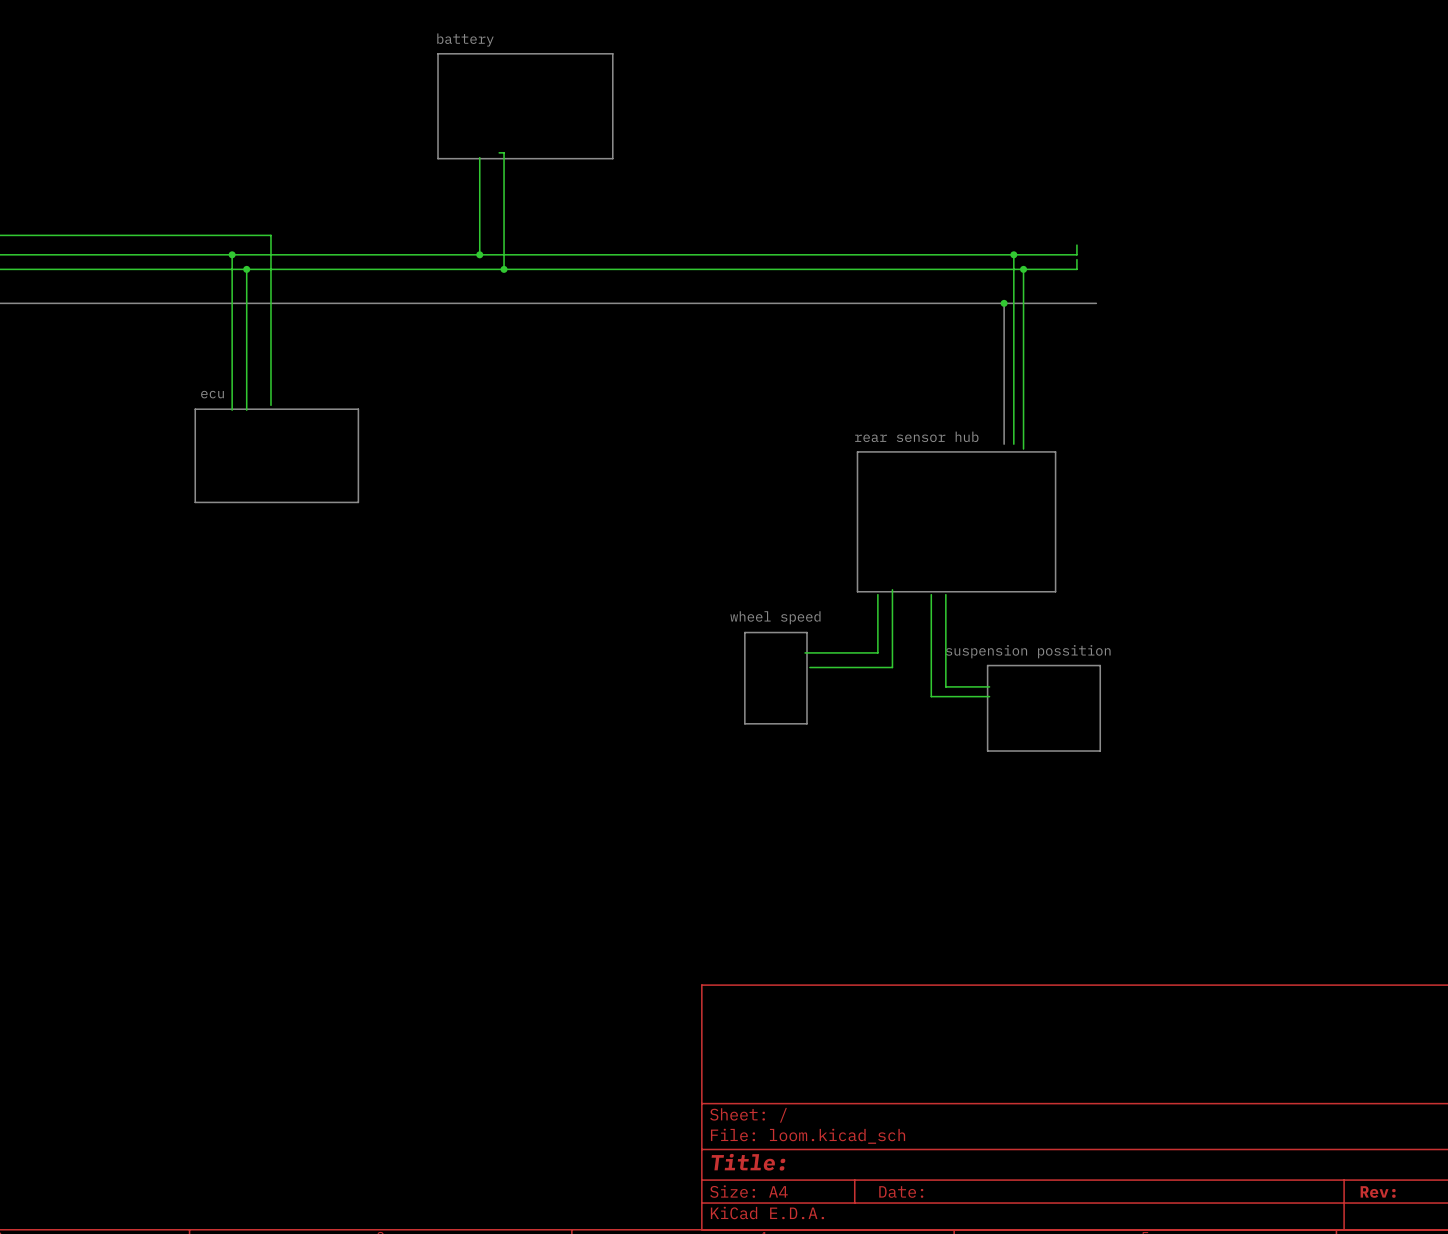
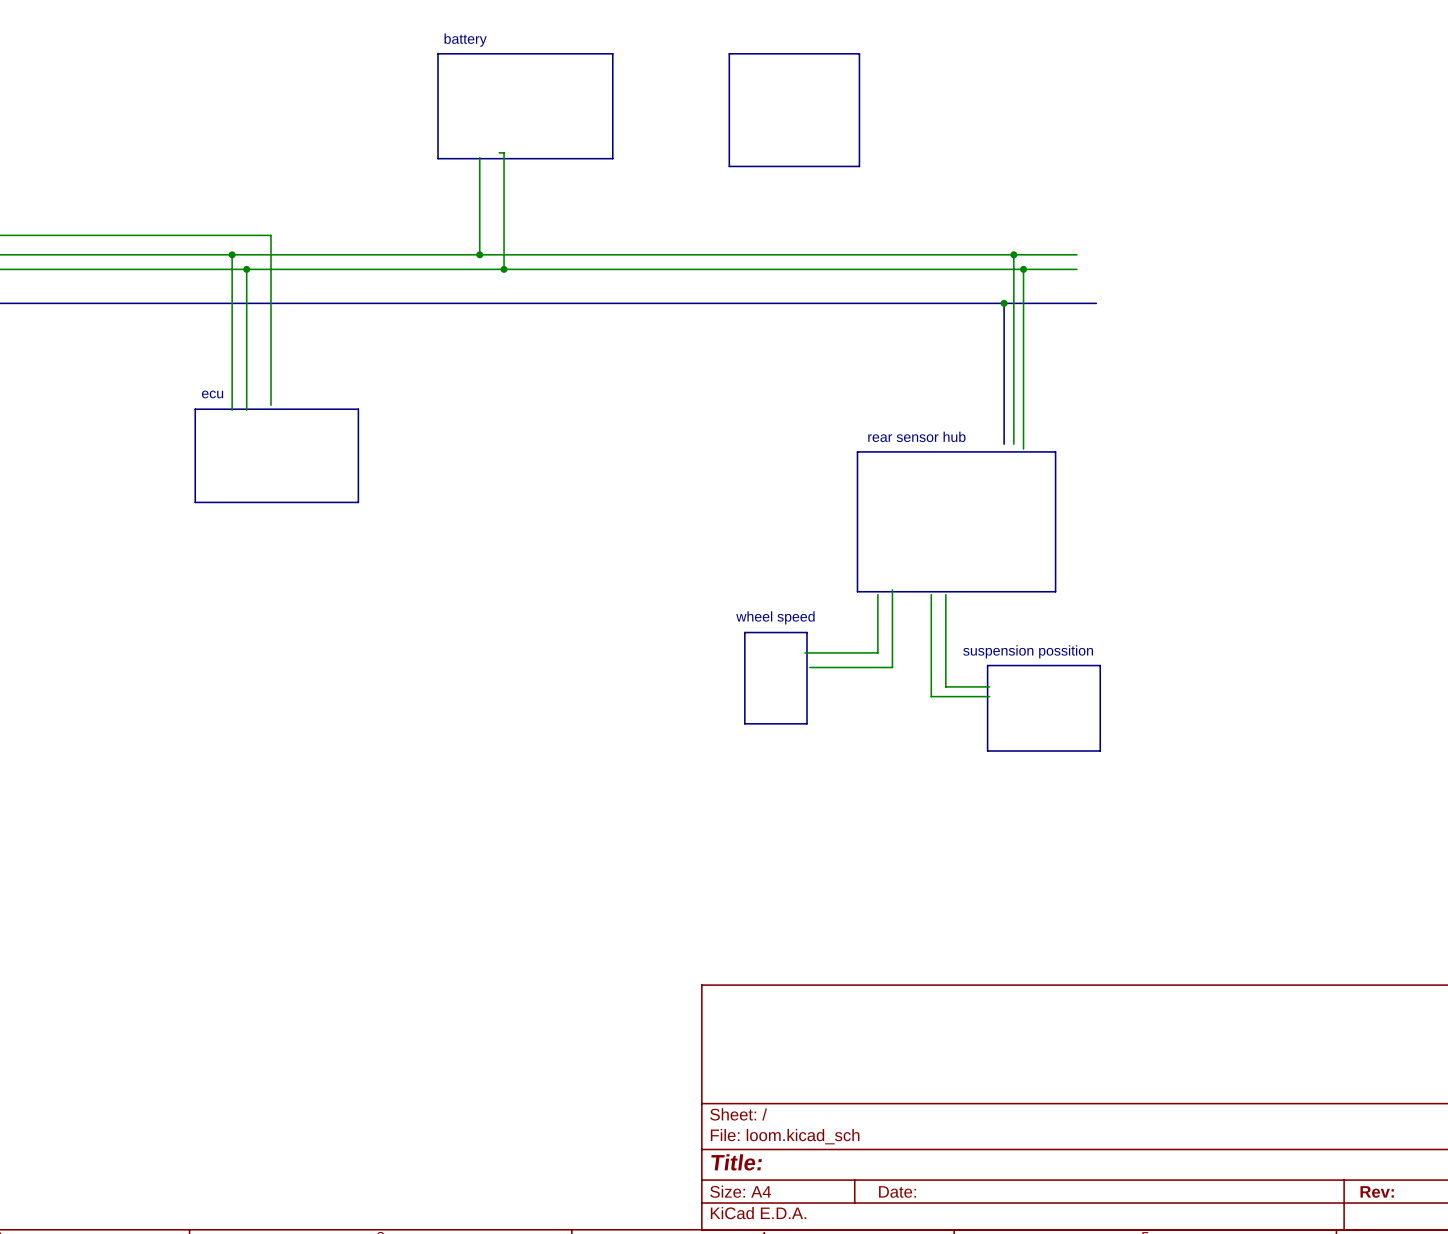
line: none -> (729, 53) (859, 53) (859, 166) (729, 166) (729, 53)
wire: (1076, 245) (1076, 254) -> none
wire: (1076, 259) (1076, 269) -> none

